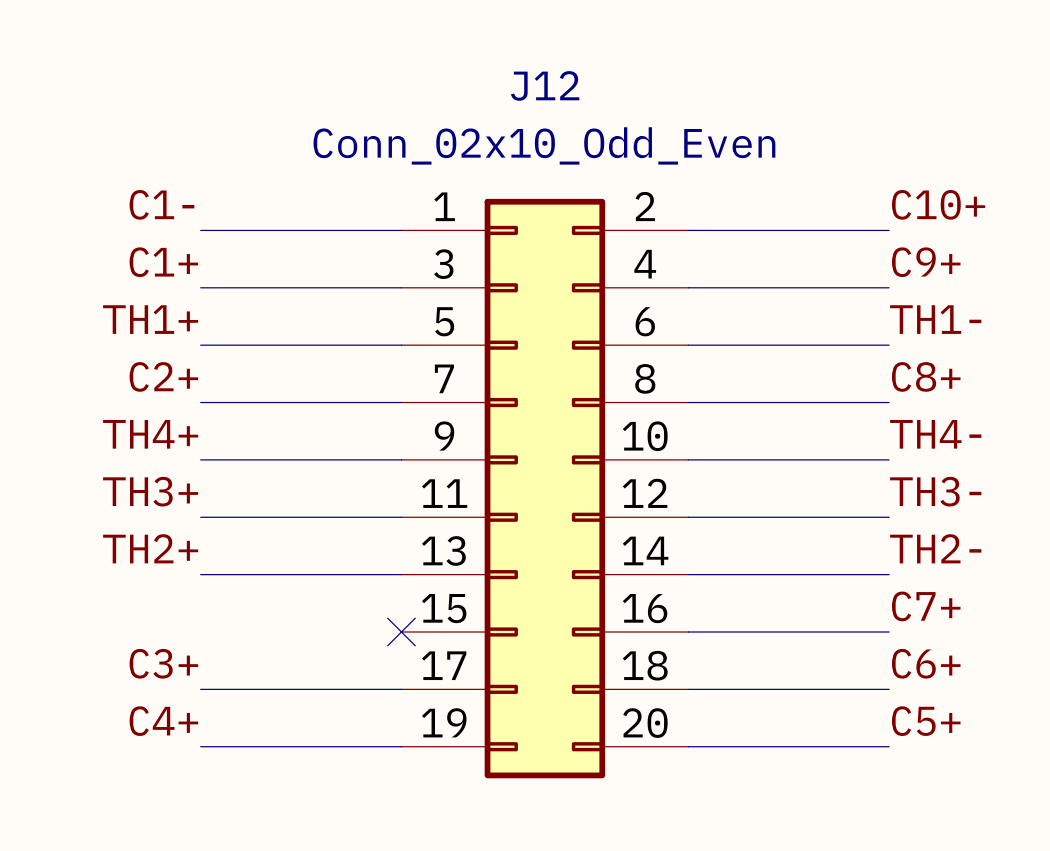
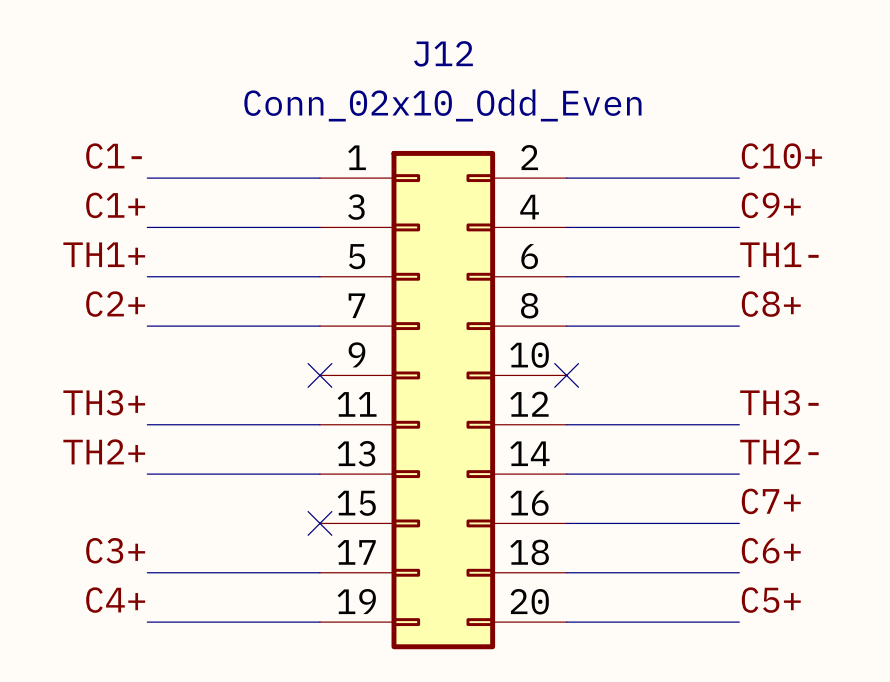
label: TH4+ (150, 434) -> none
label: TH4- (935, 434) -> none
wire: (200, 459) (401, 459) -> none
no-connect mark: none -> (319, 375)
wire: (688, 459) (889, 459) -> none
no-connect mark: none -> (566, 375)

